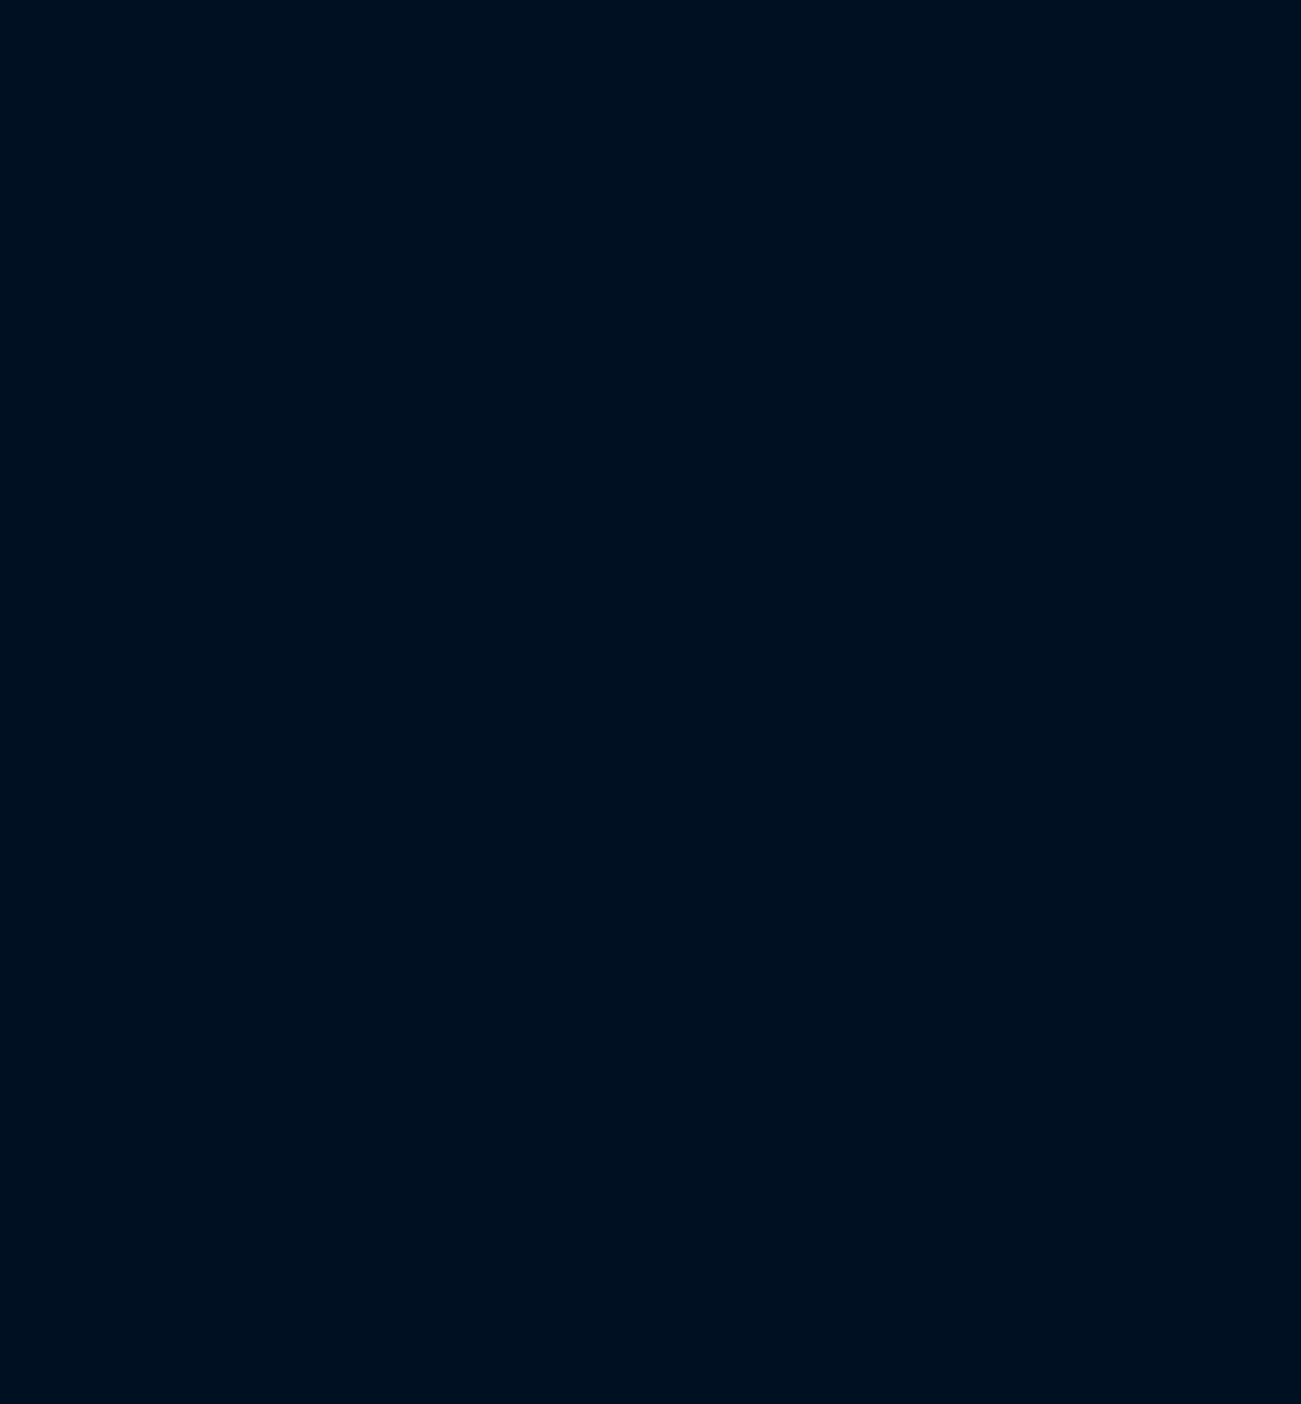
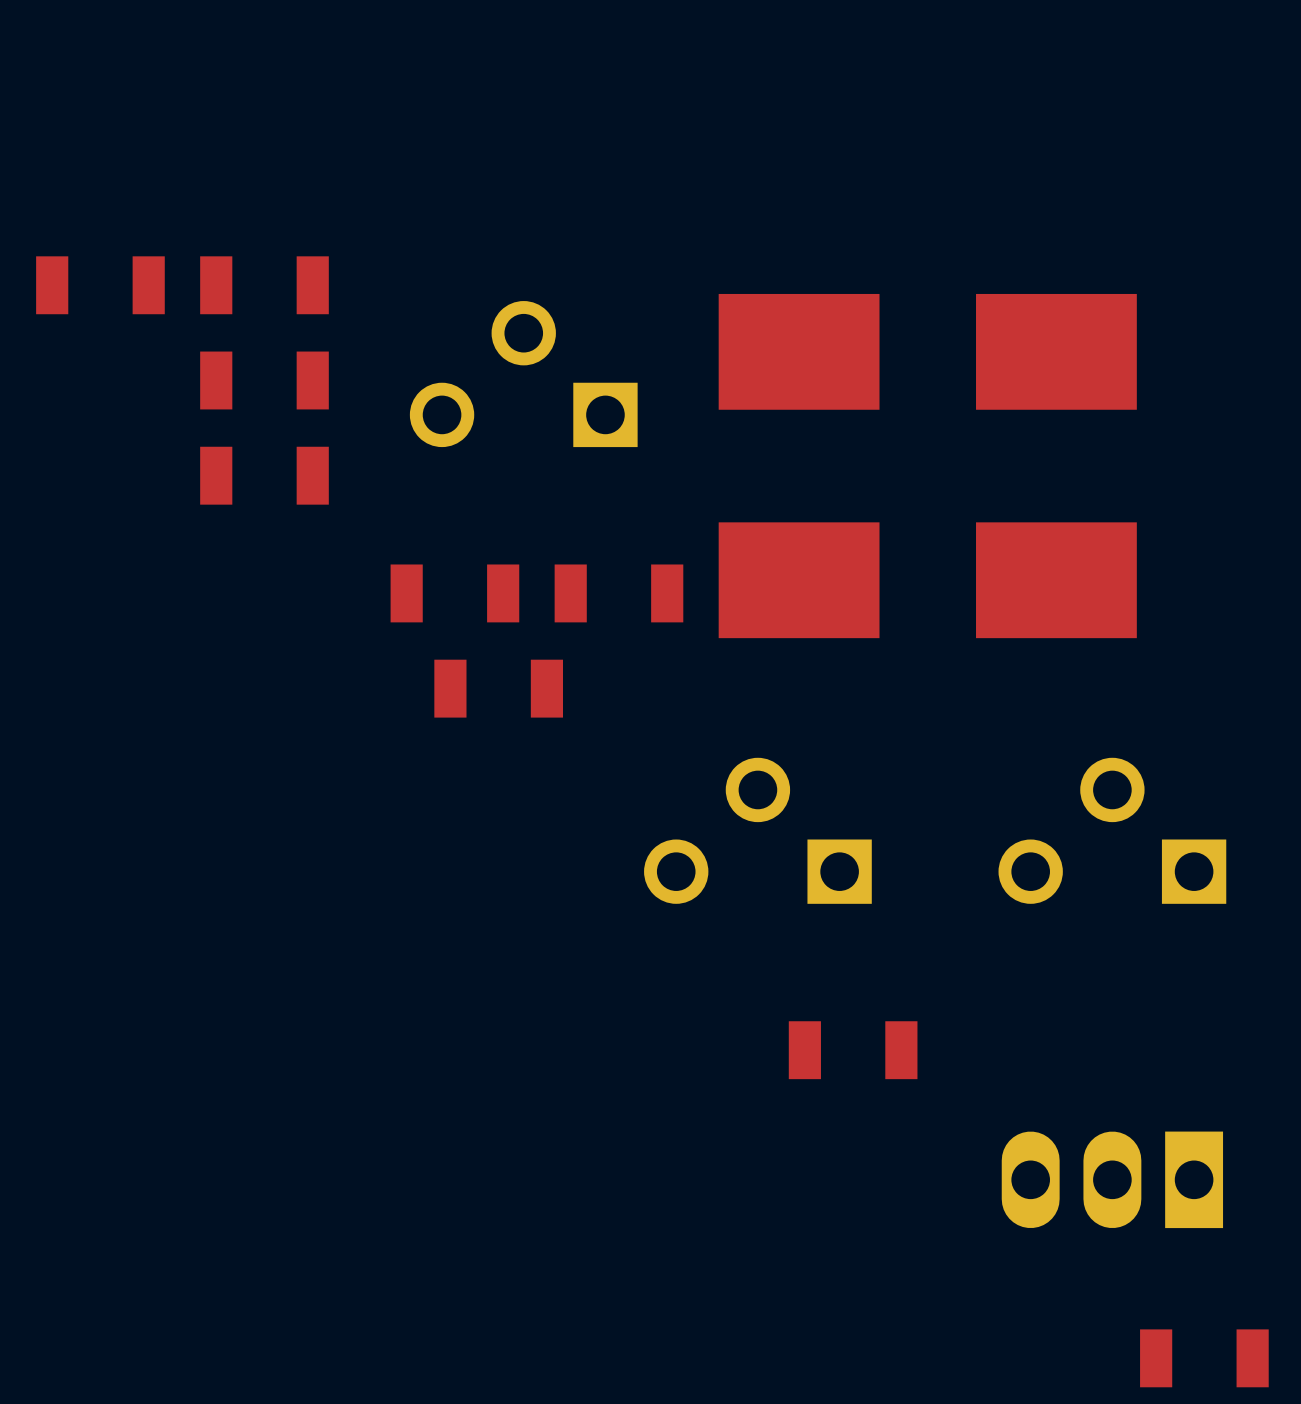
part: none -> (100, 285)
part: none -> (264, 285)
part: none -> (927, 351)
part: none -> (523, 374)
part: none -> (264, 380)
part: none -> (264, 475)
part: none -> (927, 580)
part: none -> (454, 593)
part: none -> (618, 593)
part: none -> (498, 688)
part: none -> (757, 830)
part: none -> (1112, 830)
part: none -> (853, 1050)
part: none -> (1112, 1179)
part: none -> (1204, 1358)

